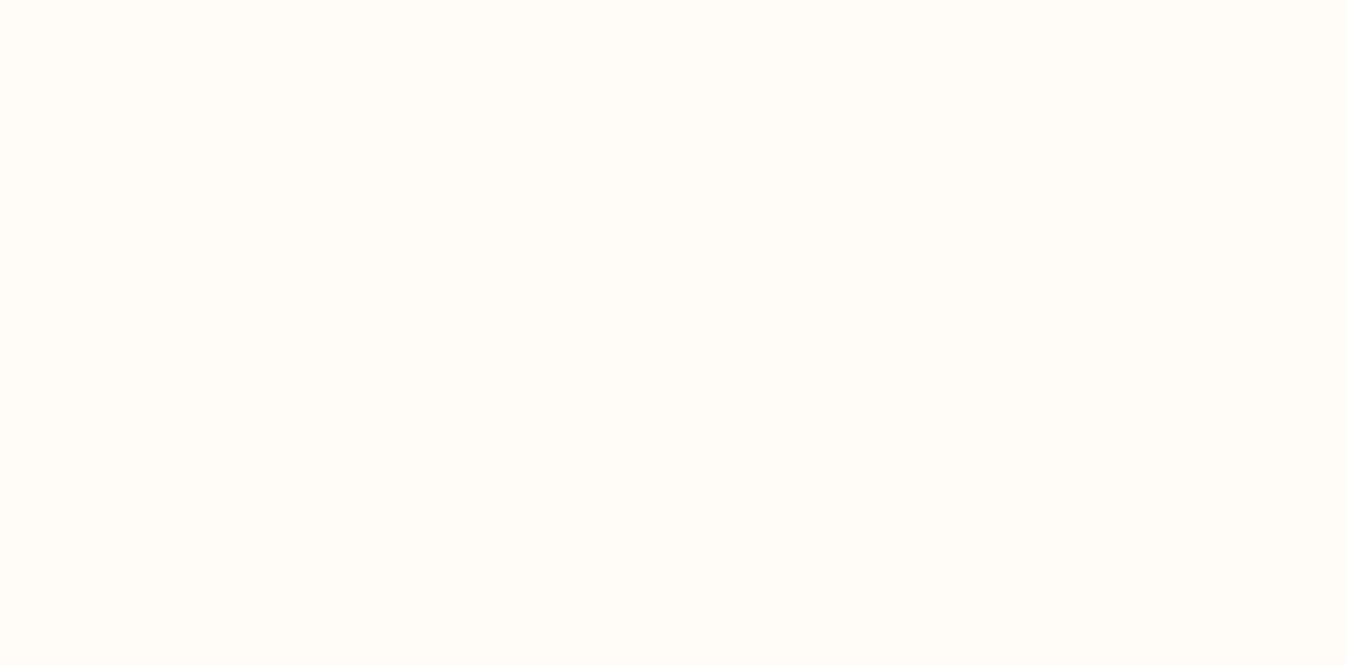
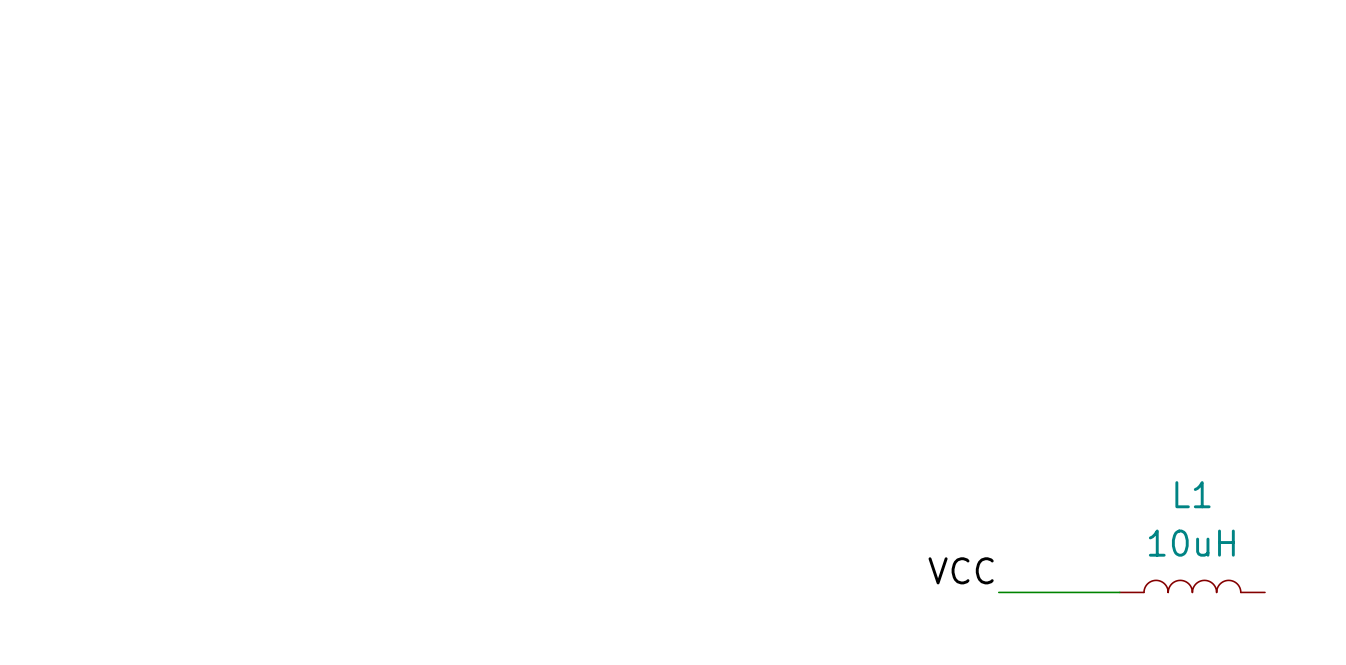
label: none -> VCC (961, 570)
L1: none -> 10uH (1192, 586)
wire: none -> (998, 592) (1119, 592)

